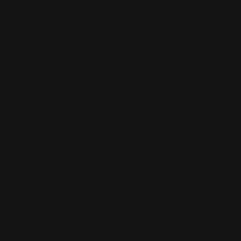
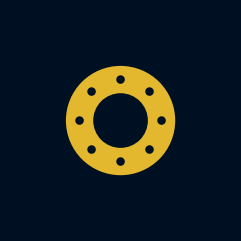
part: none -> (120, 120)

